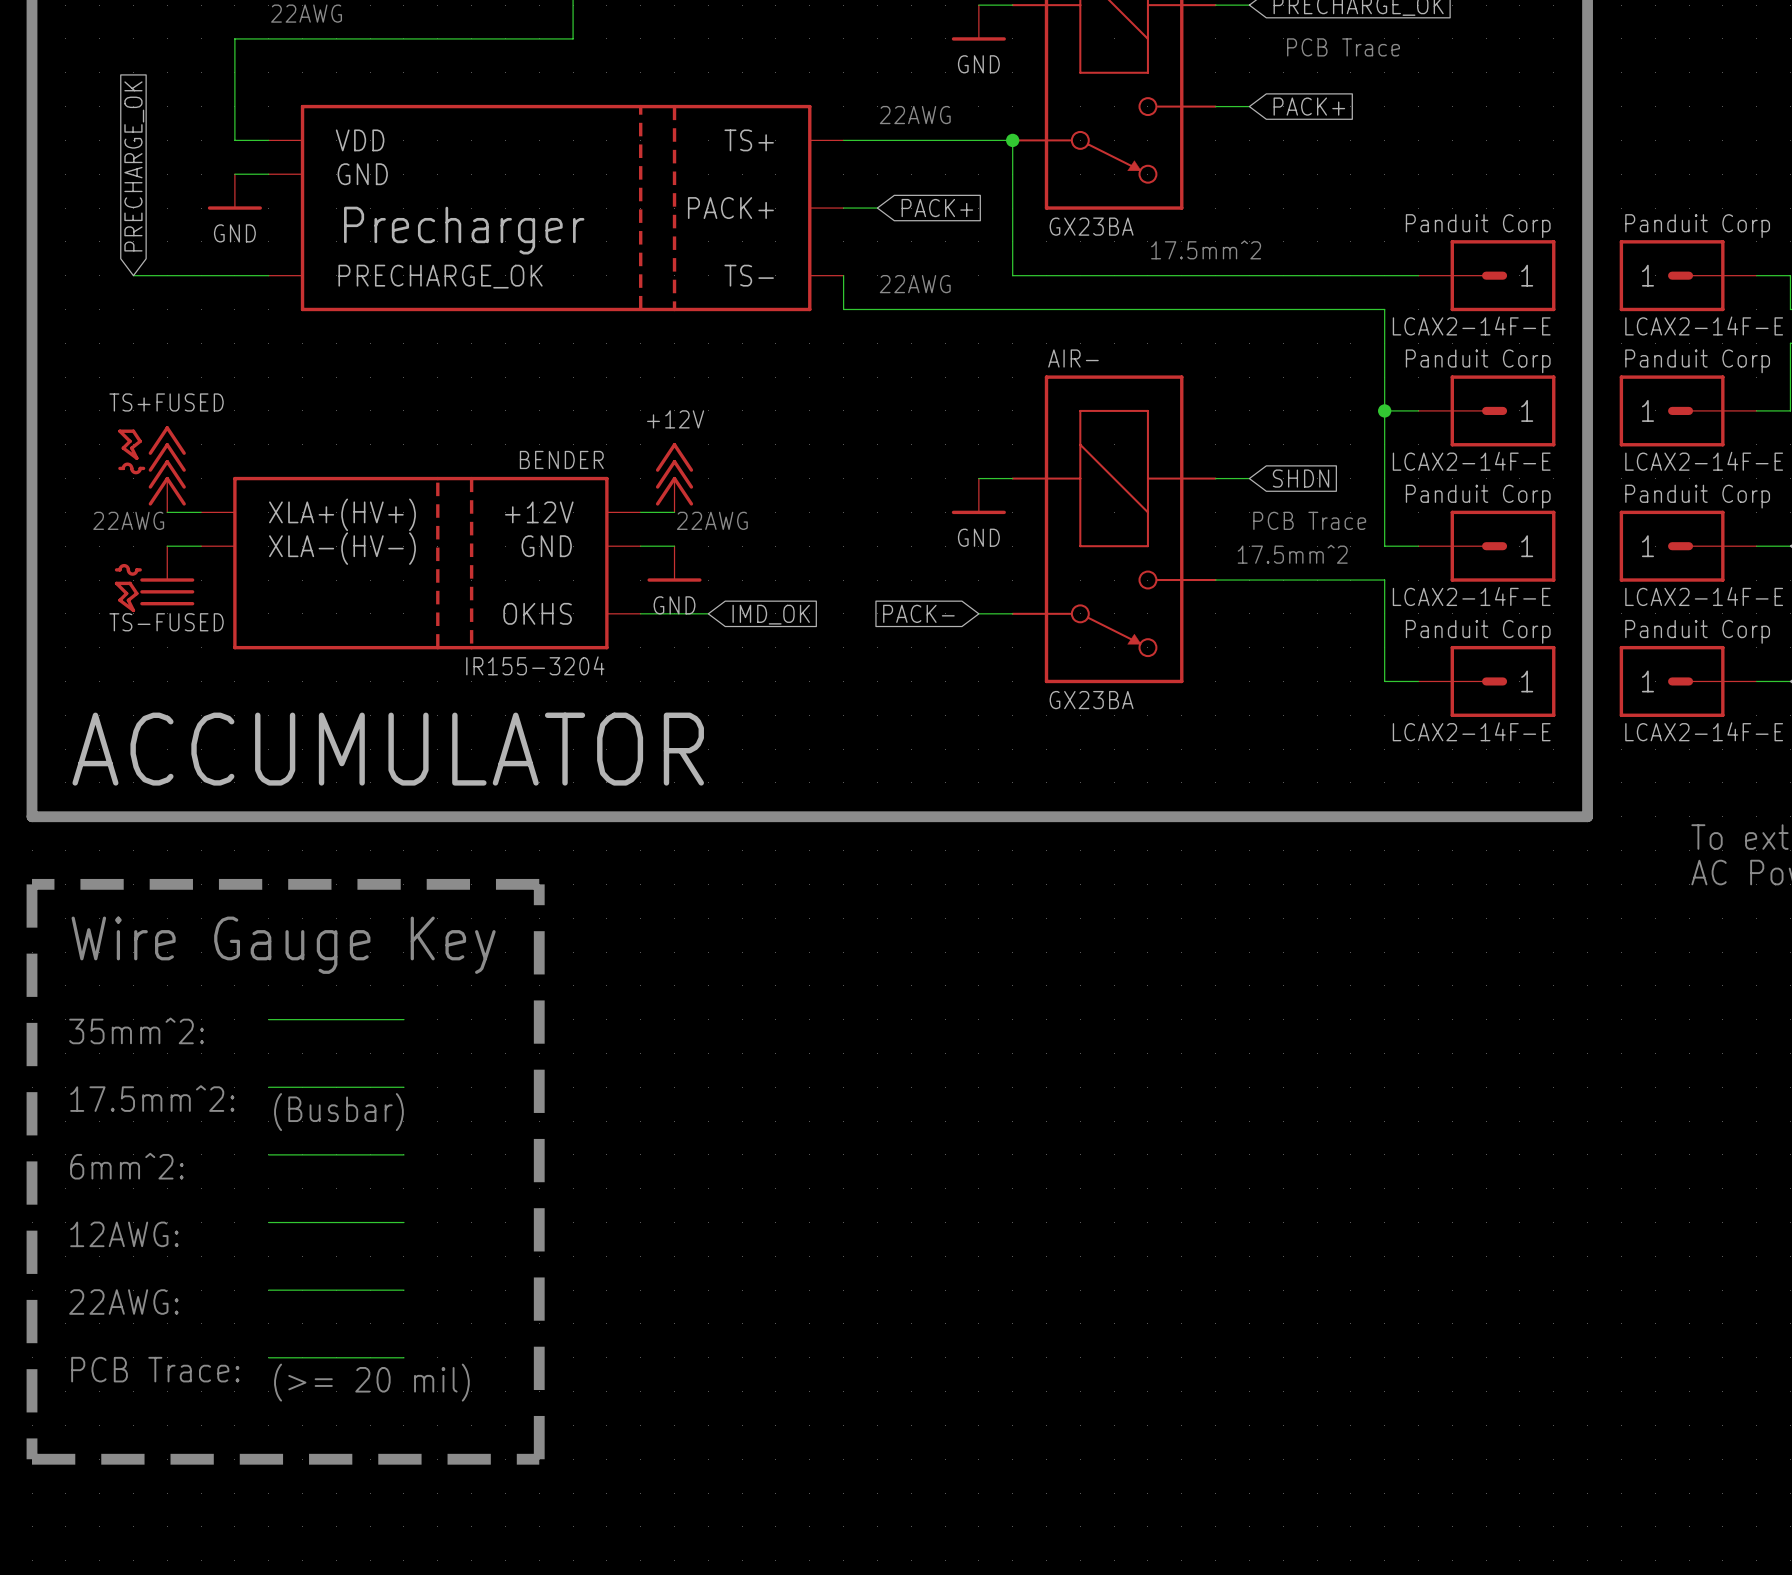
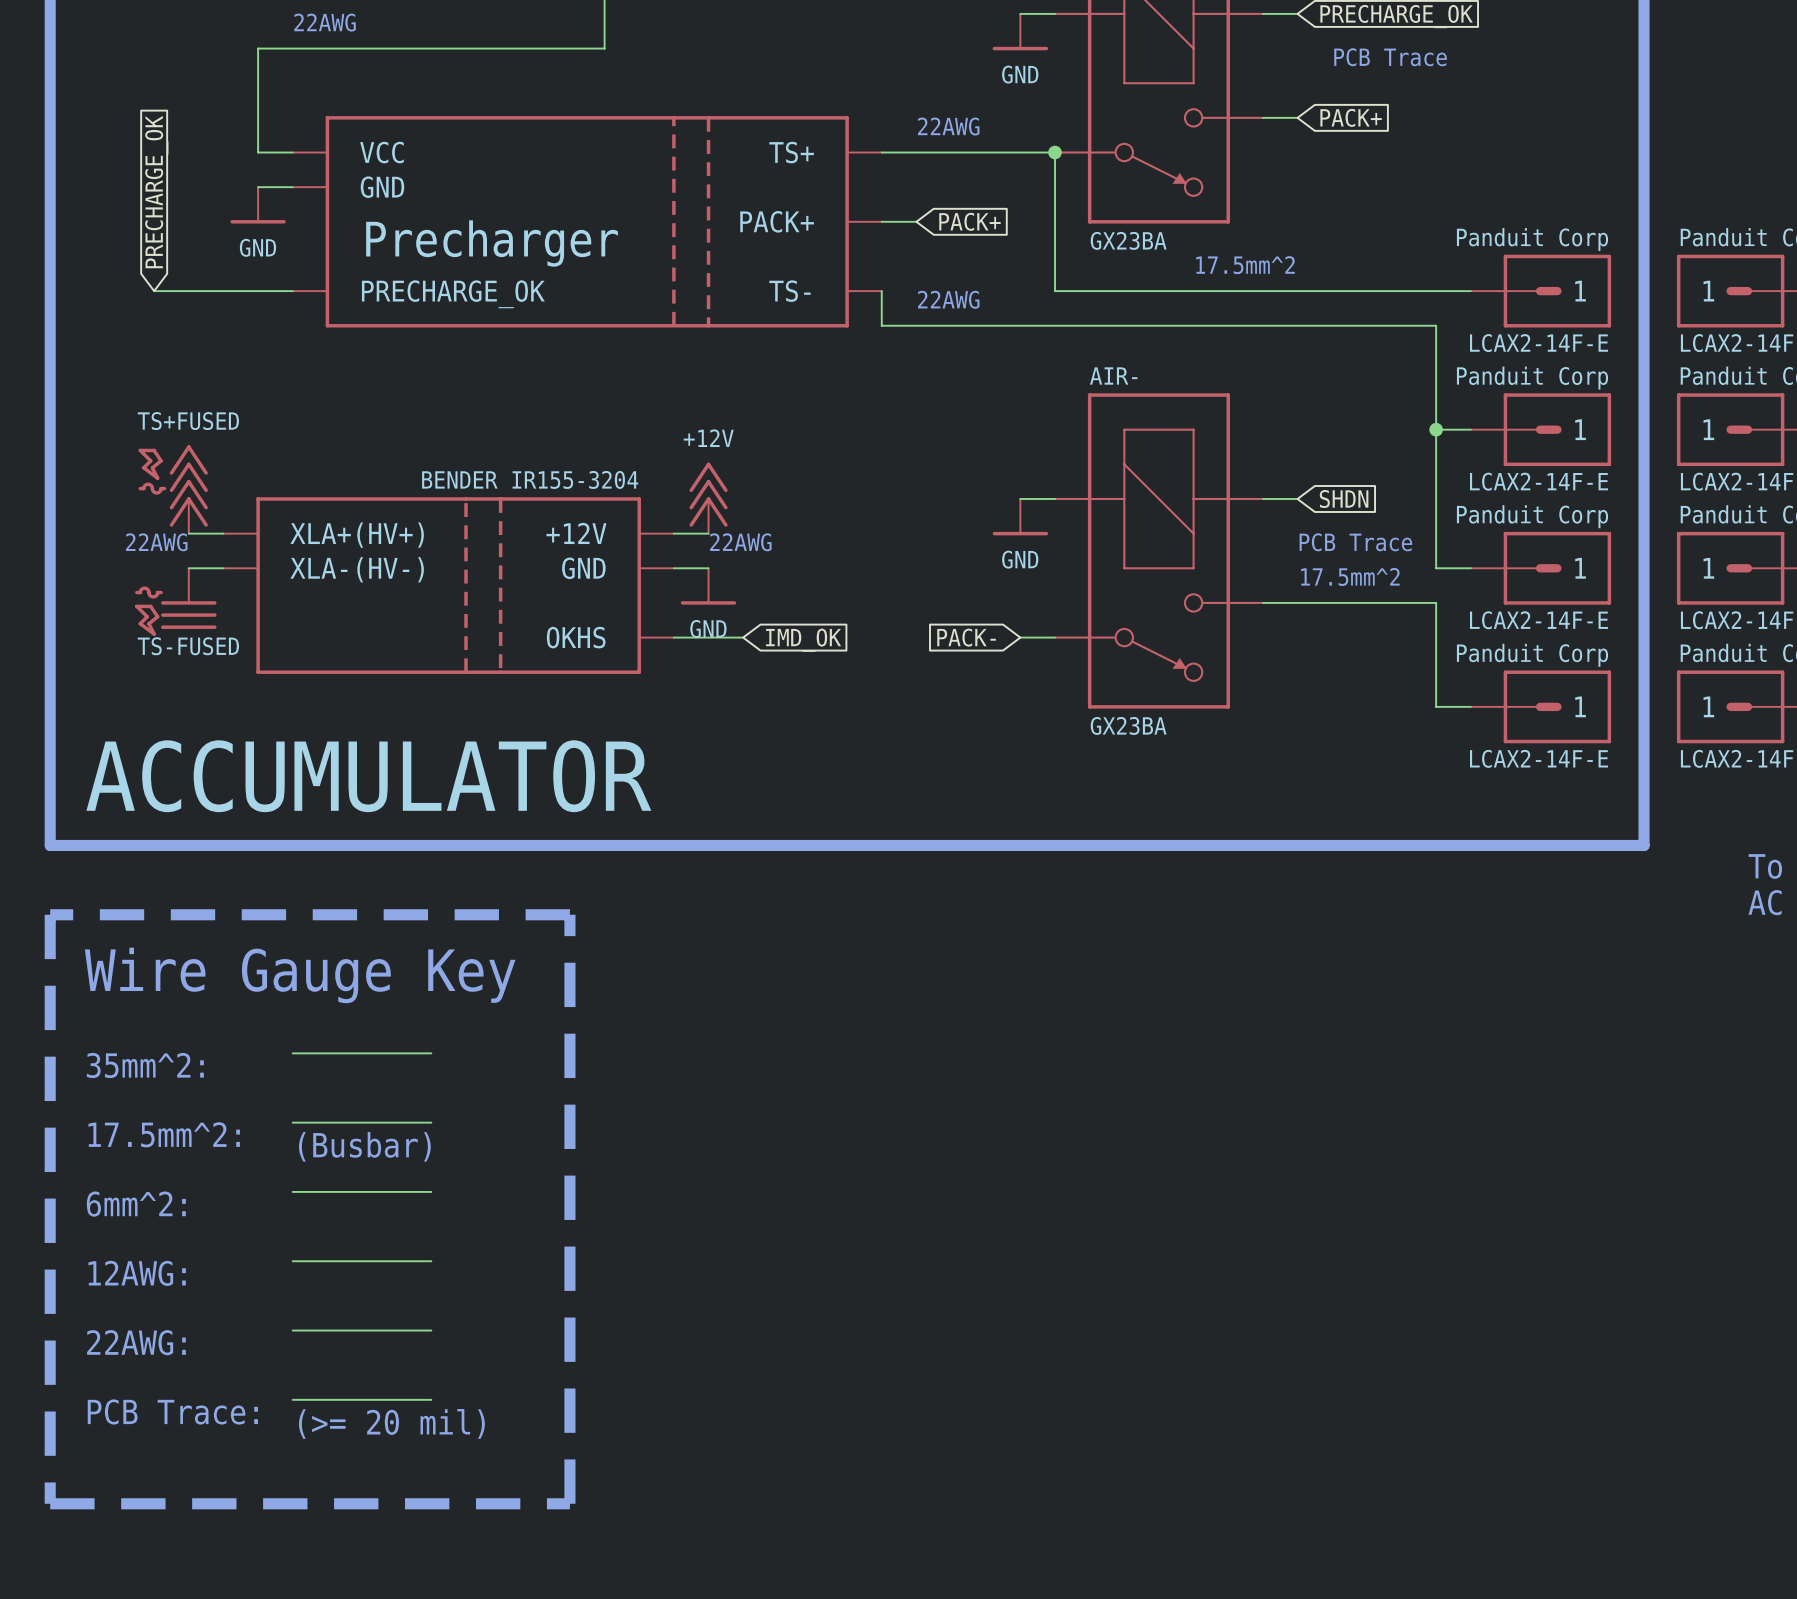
part pin name: VDD (360, 140) -> VCC (381, 152)
part text: BENDER (561, 459) -> BENDER IR155-3204 (530, 479)
part text: IR155-3204 (535, 665) -> none

